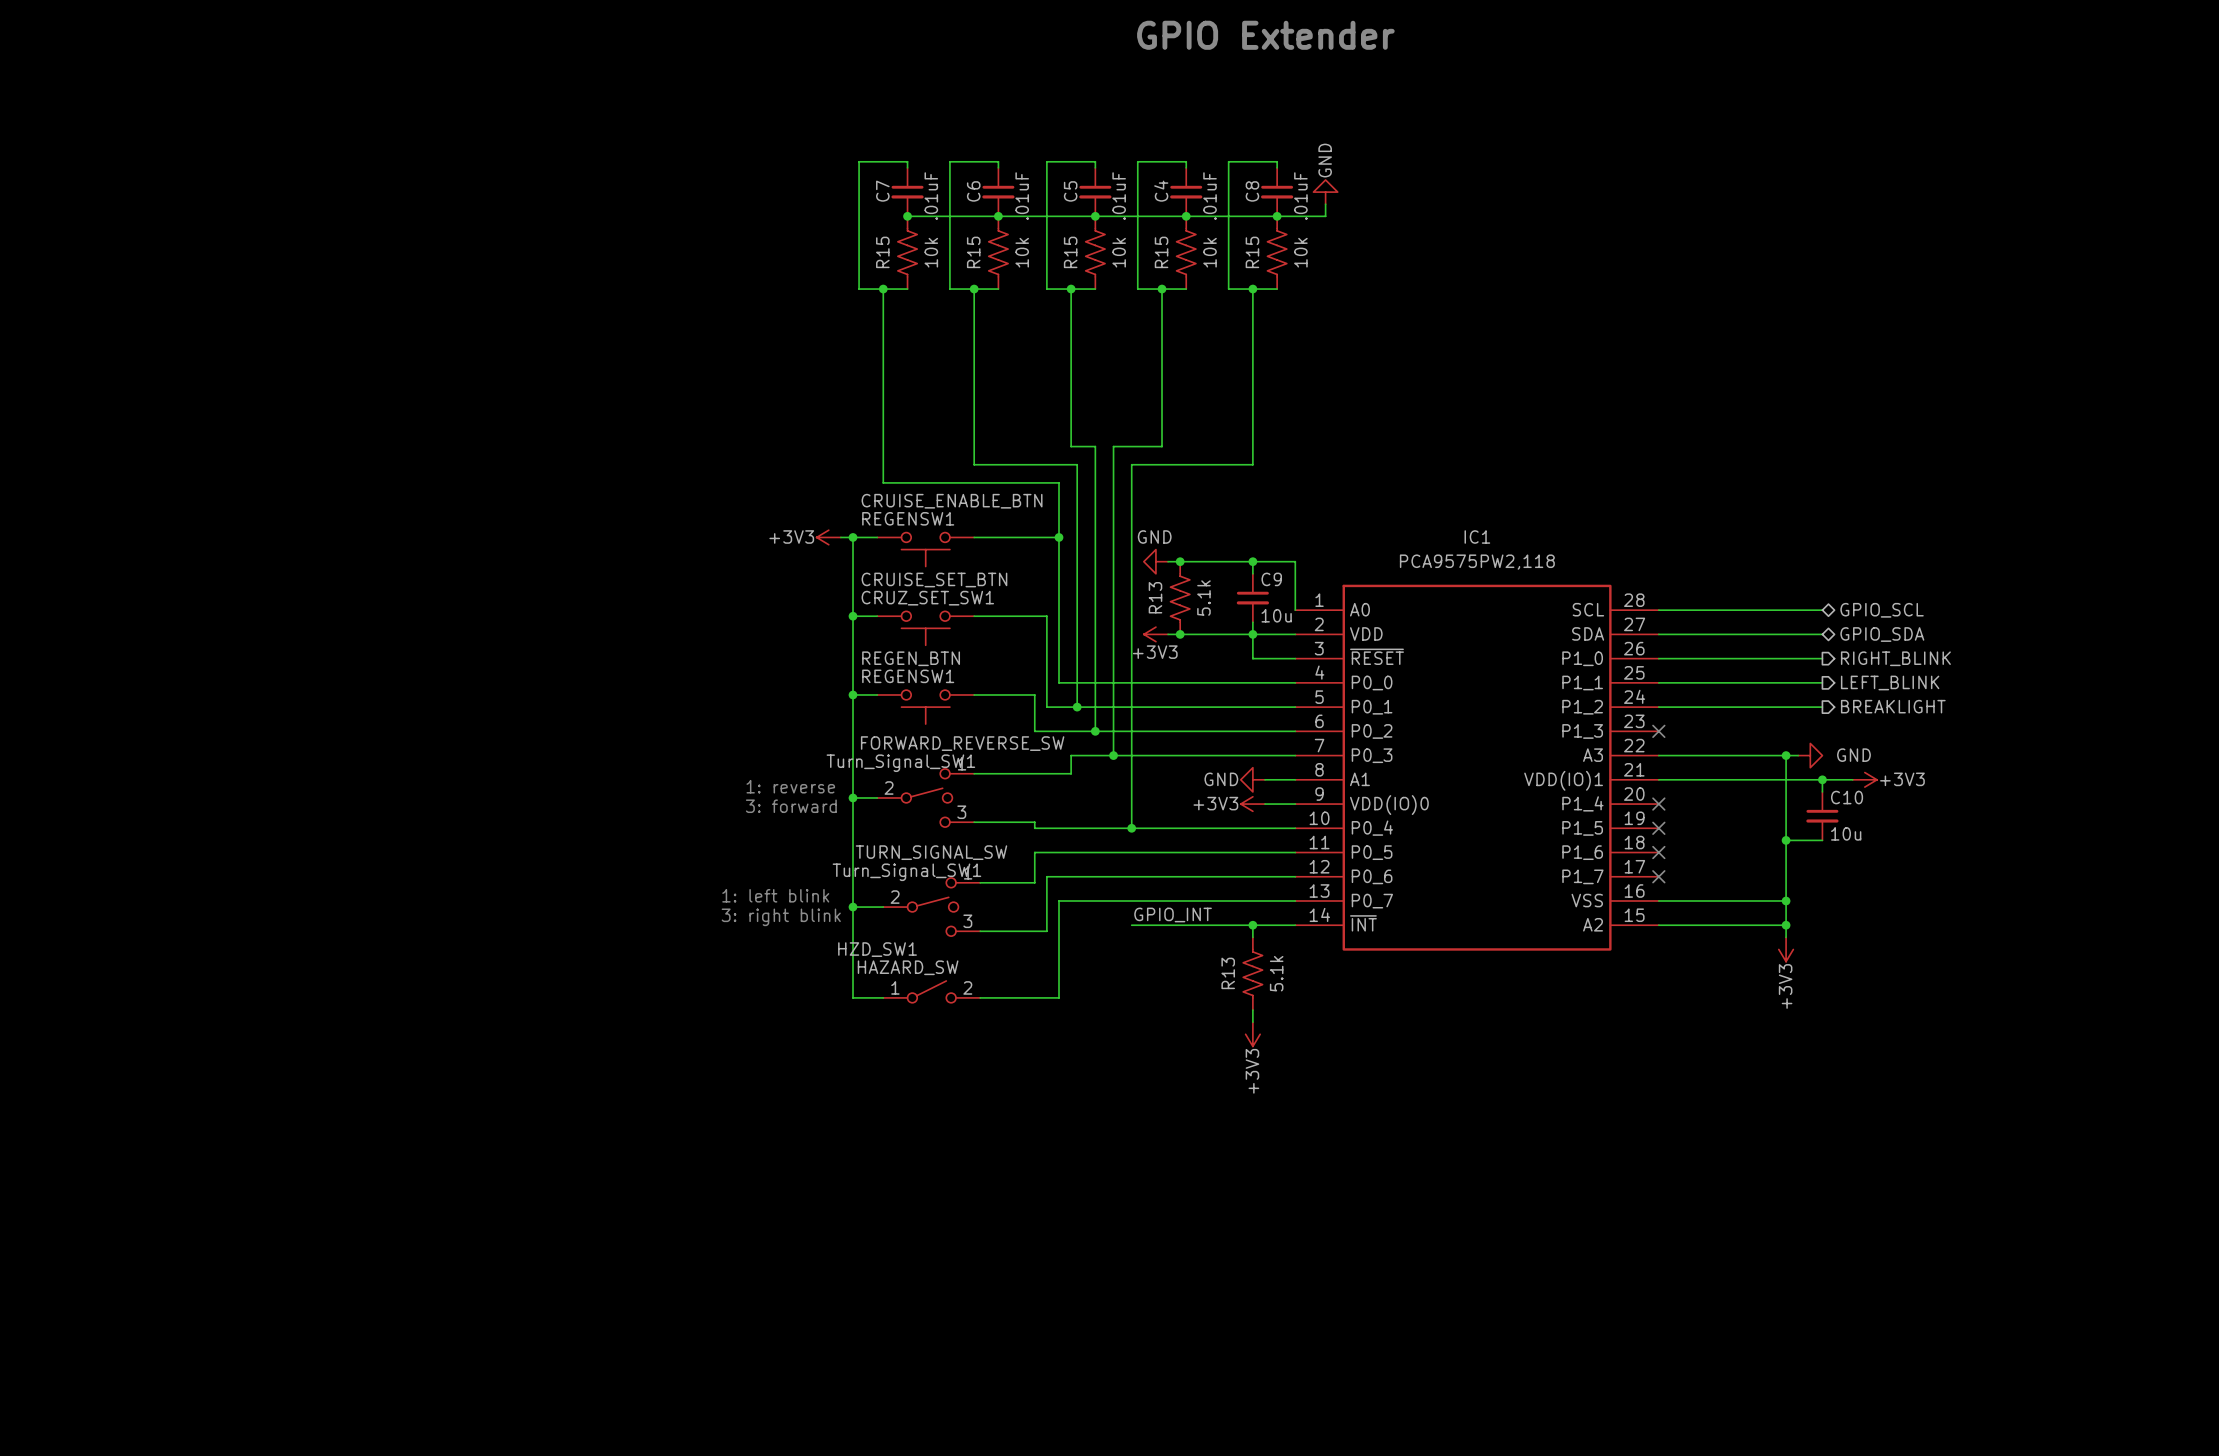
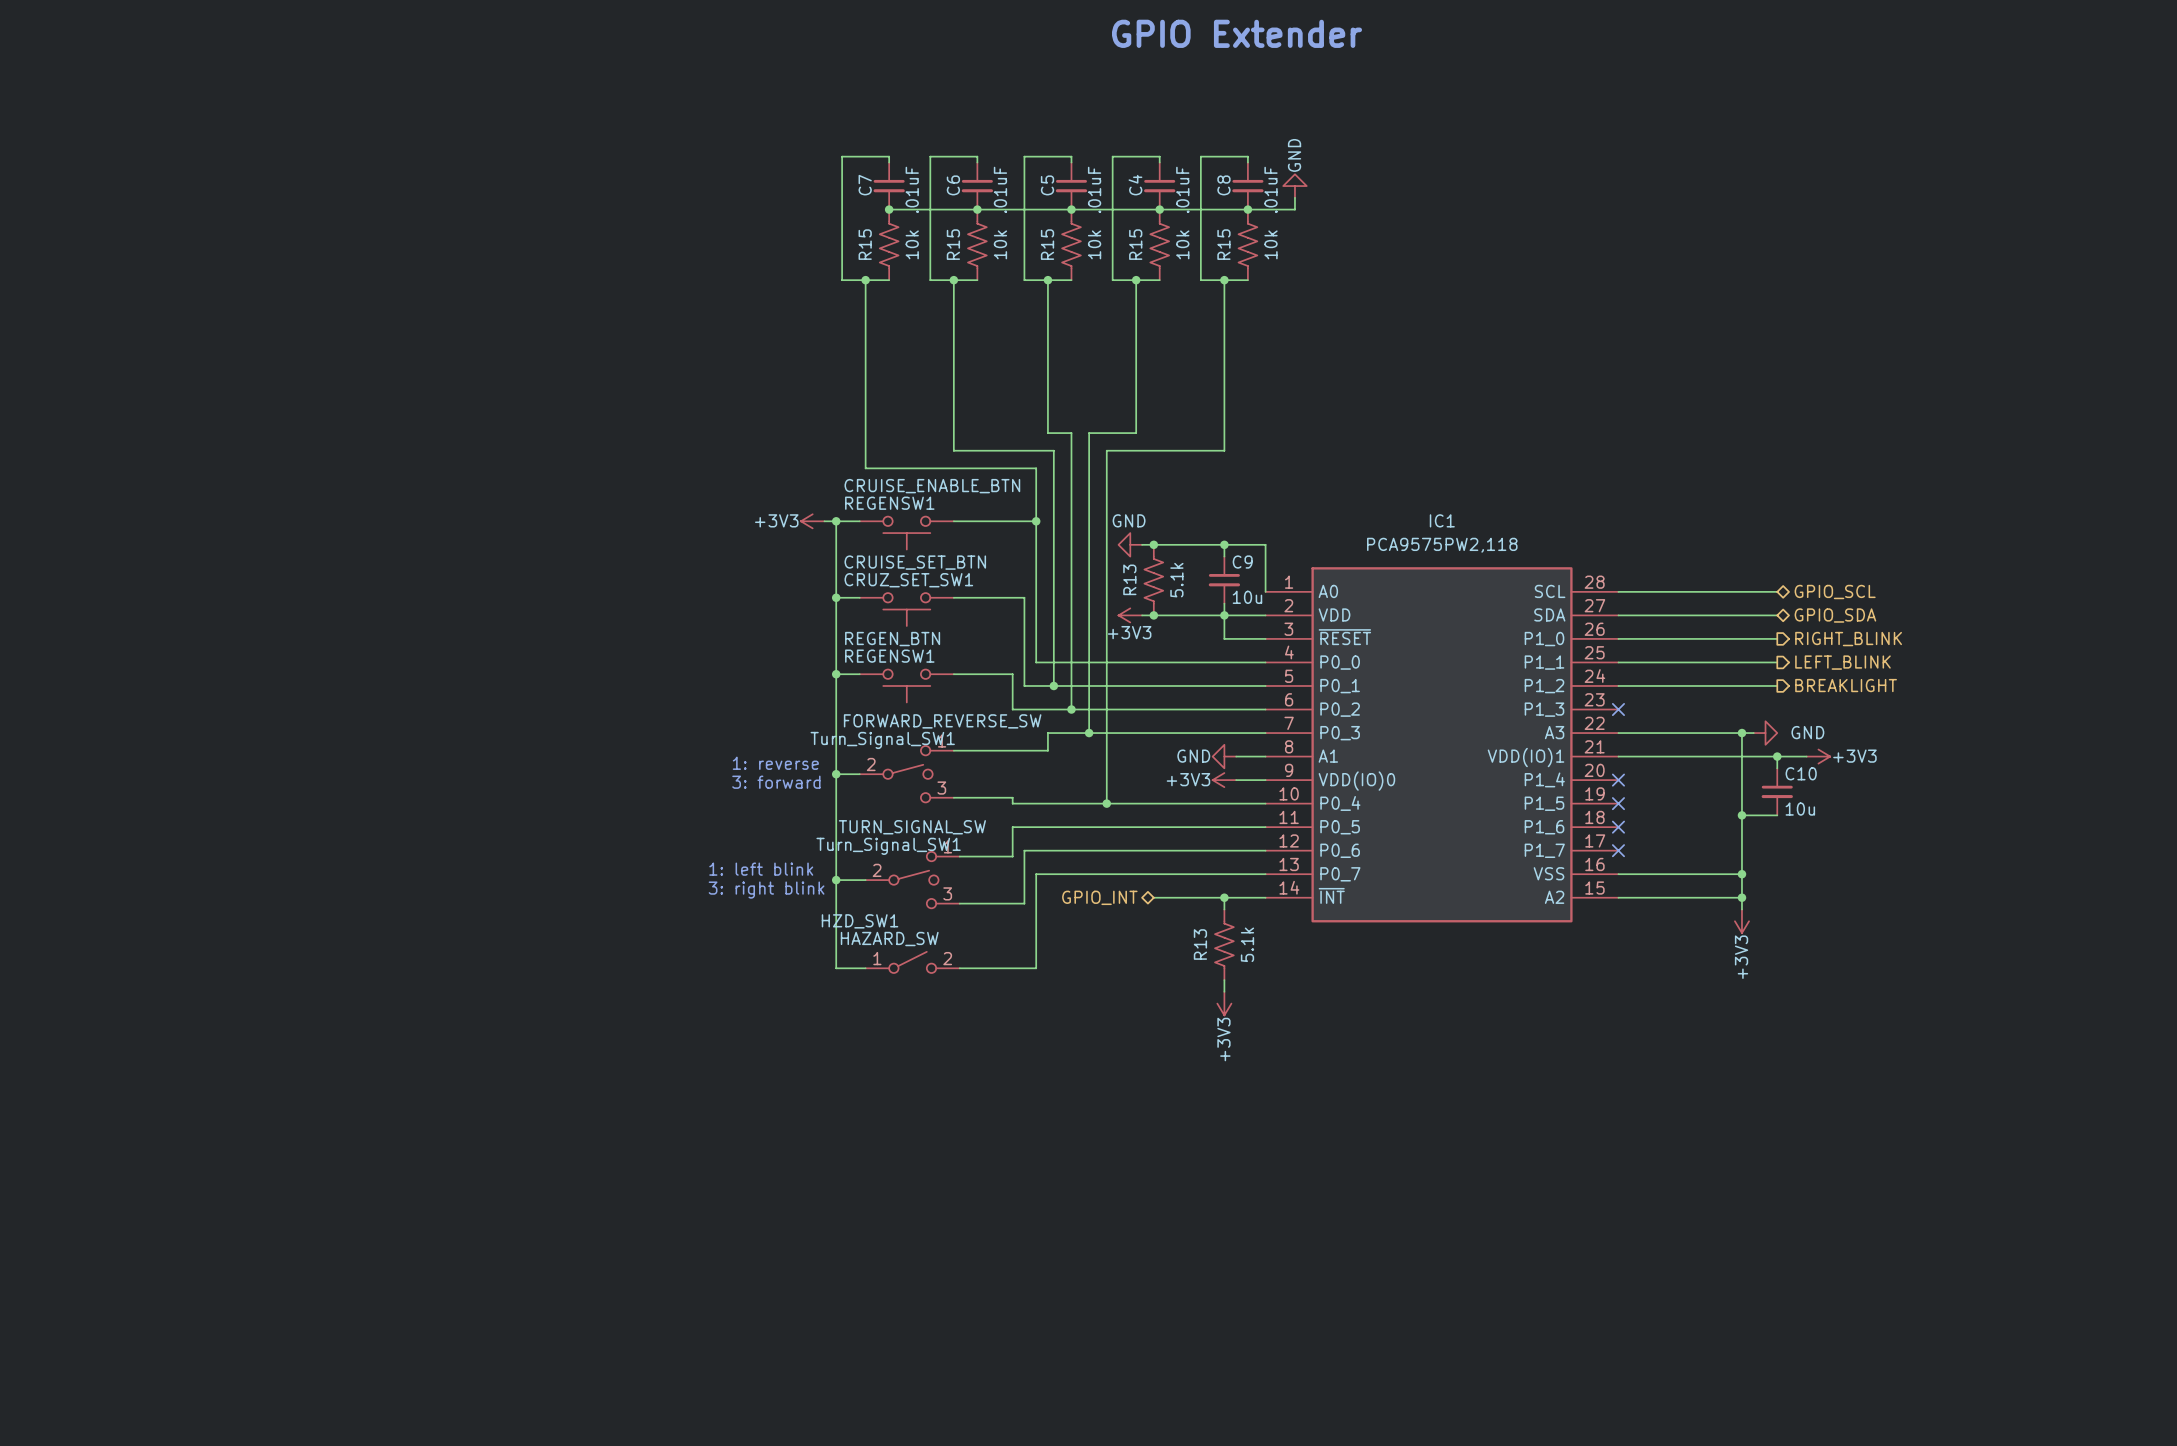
label: GPIO_INT (1173, 914) -> none
hierarchical label: none -> GPIO_INT (1099, 897)
wire: (1131, 925) (1180, 925) -> none

